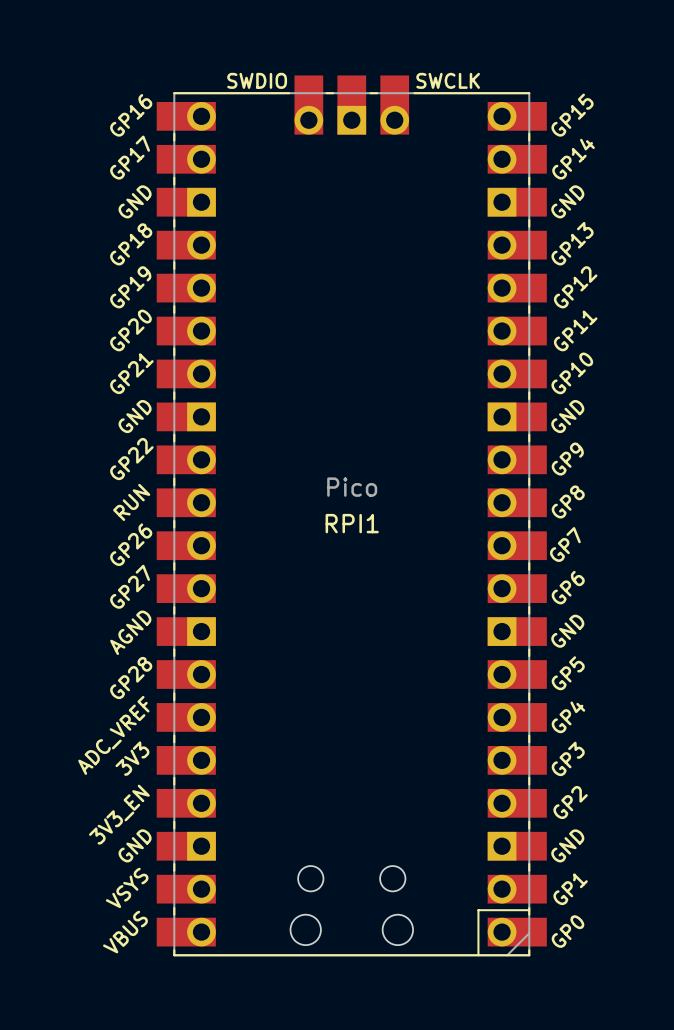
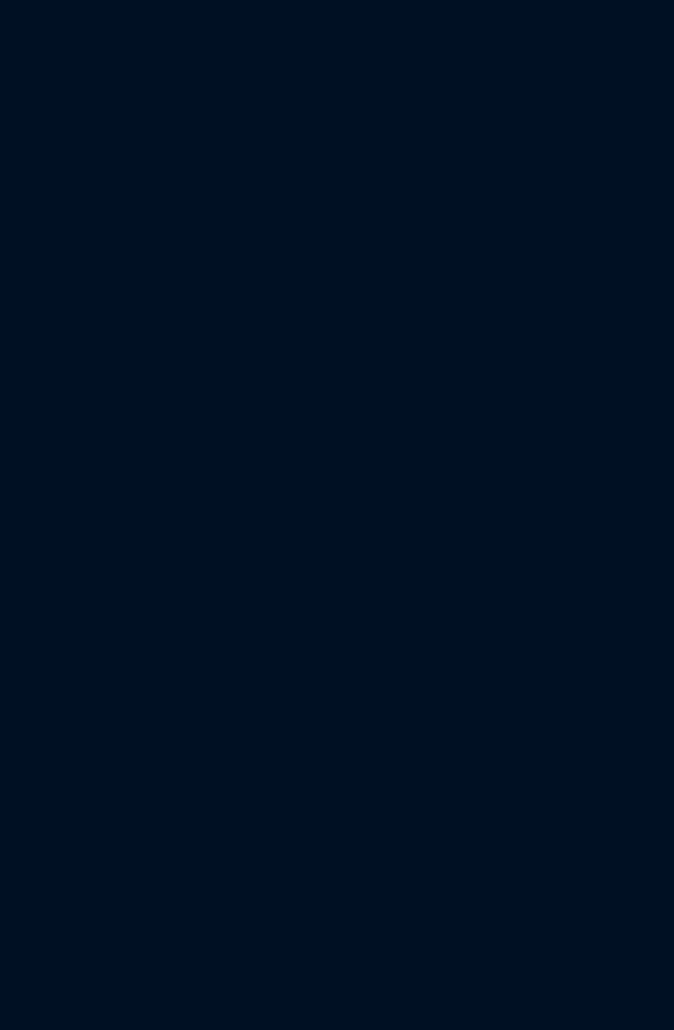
RPI1: Pico (351, 515) -> none

